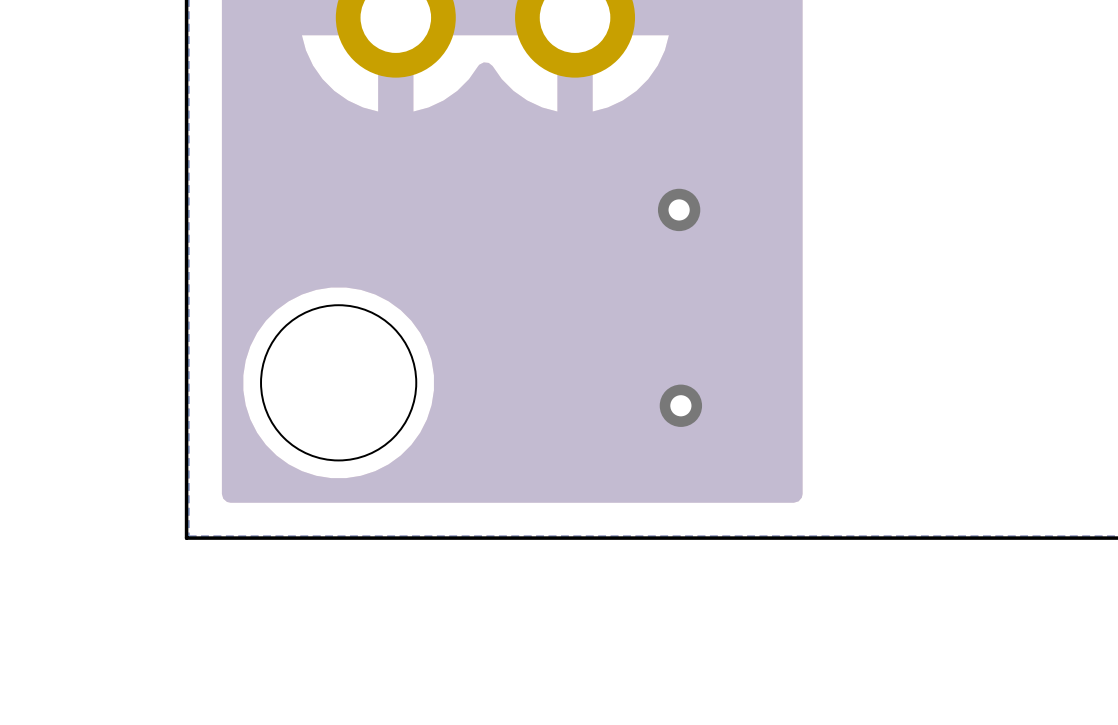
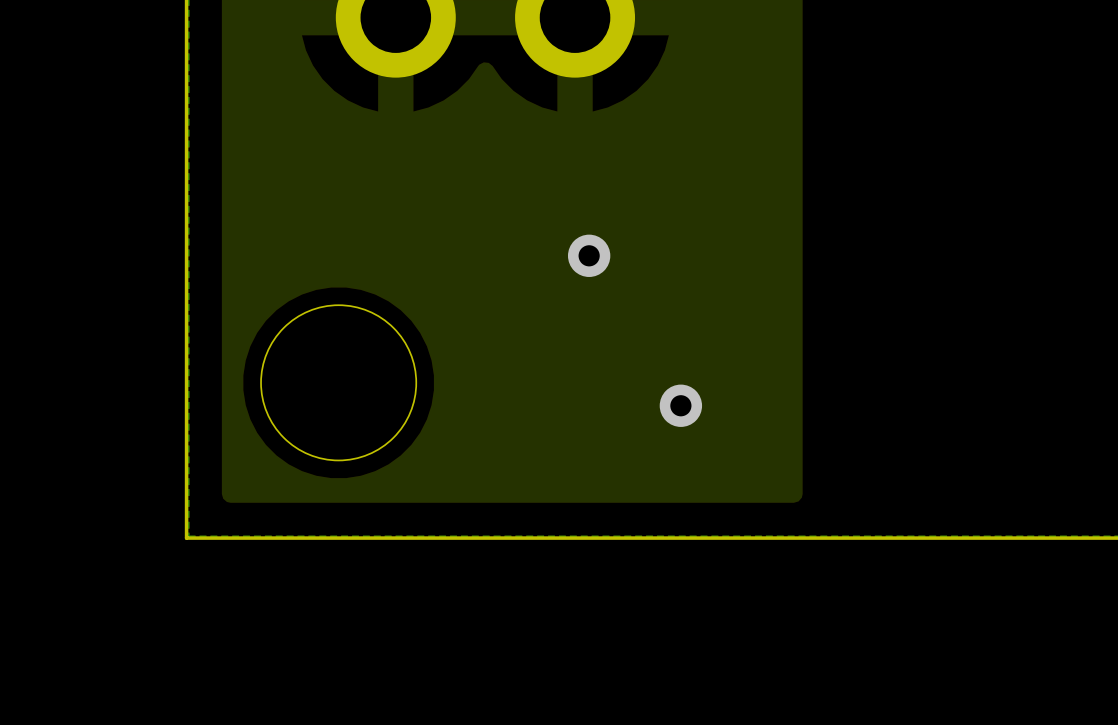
via position: (679, 209) -> (589, 255)

